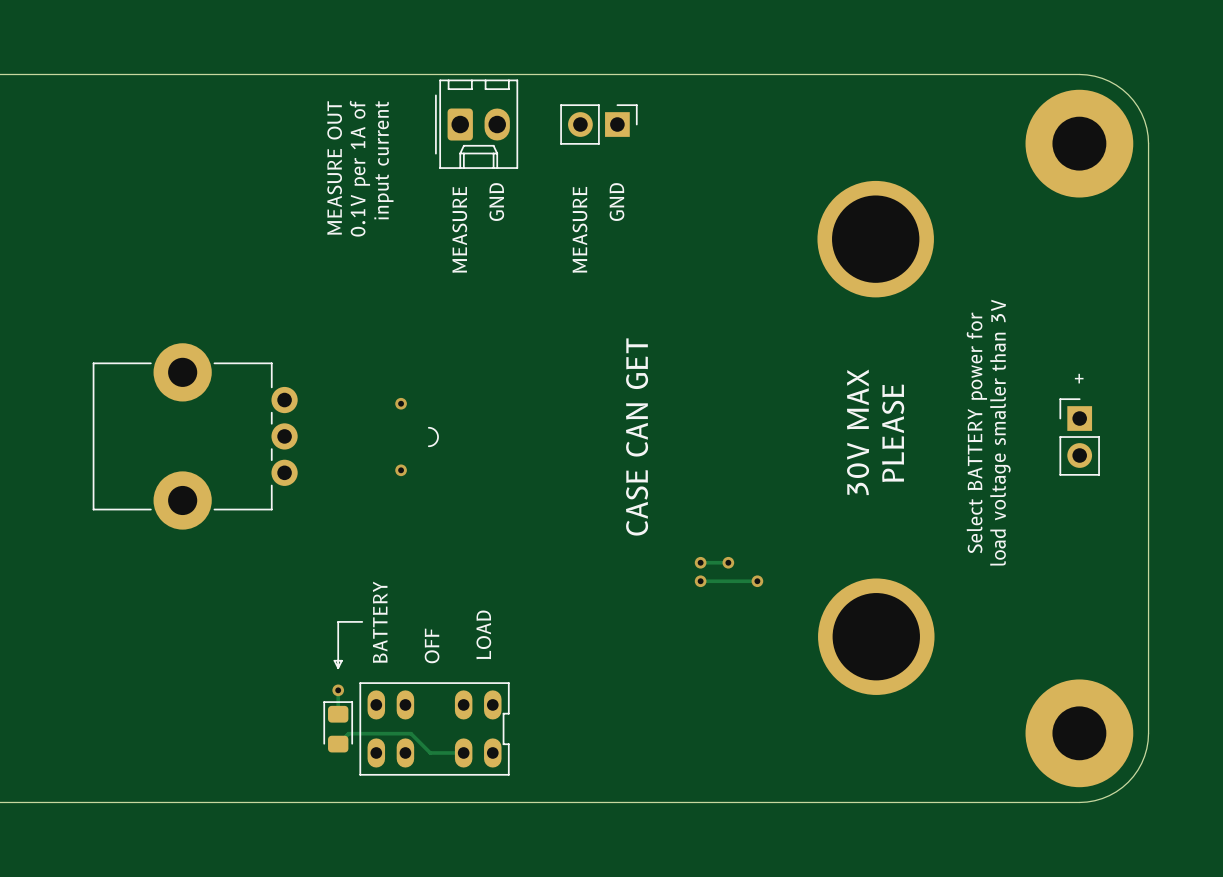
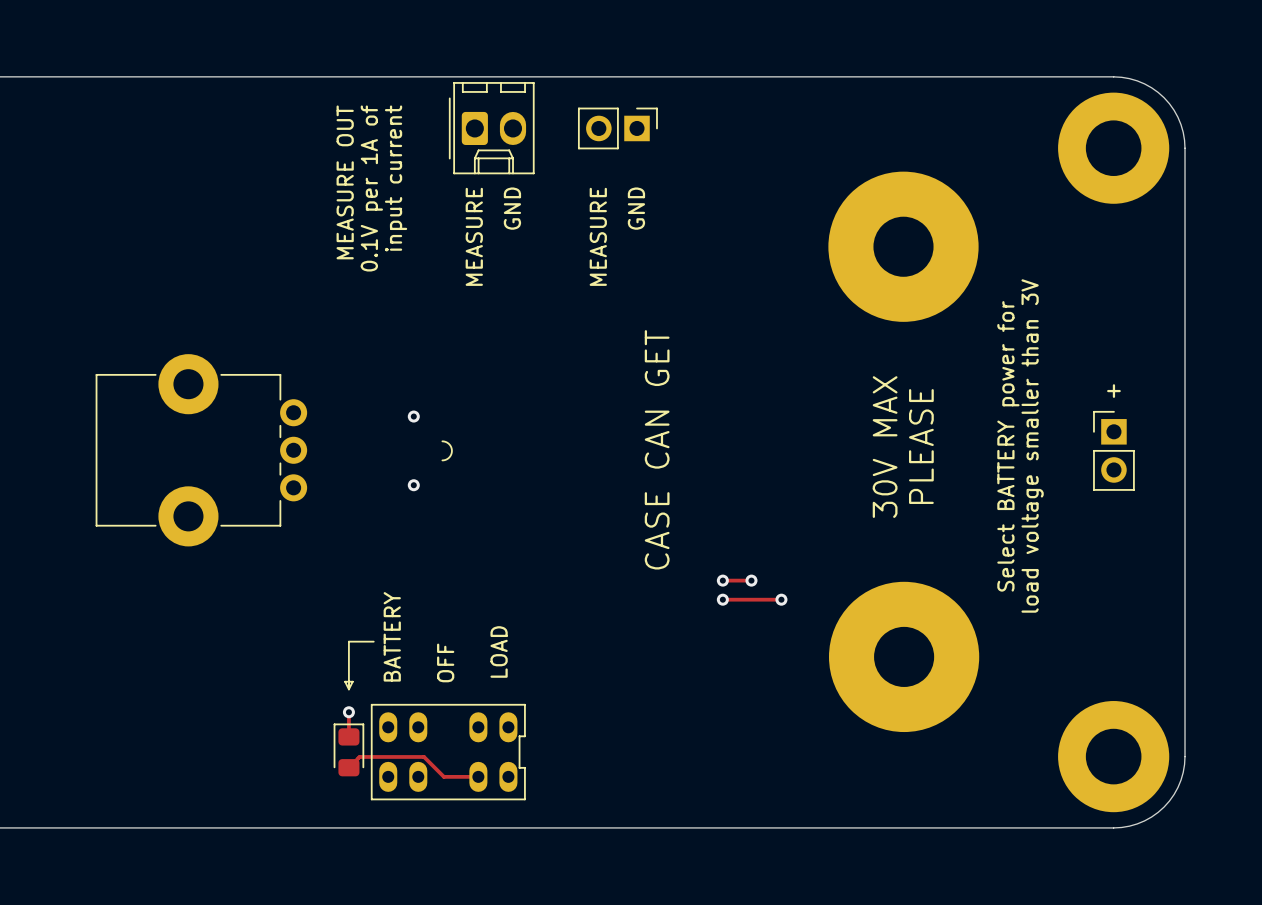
part footprint: [817, 180, 934, 298] -> [828, 171, 979, 322]
part footprint: [818, 578, 935, 695] -> [828, 581, 980, 733]

